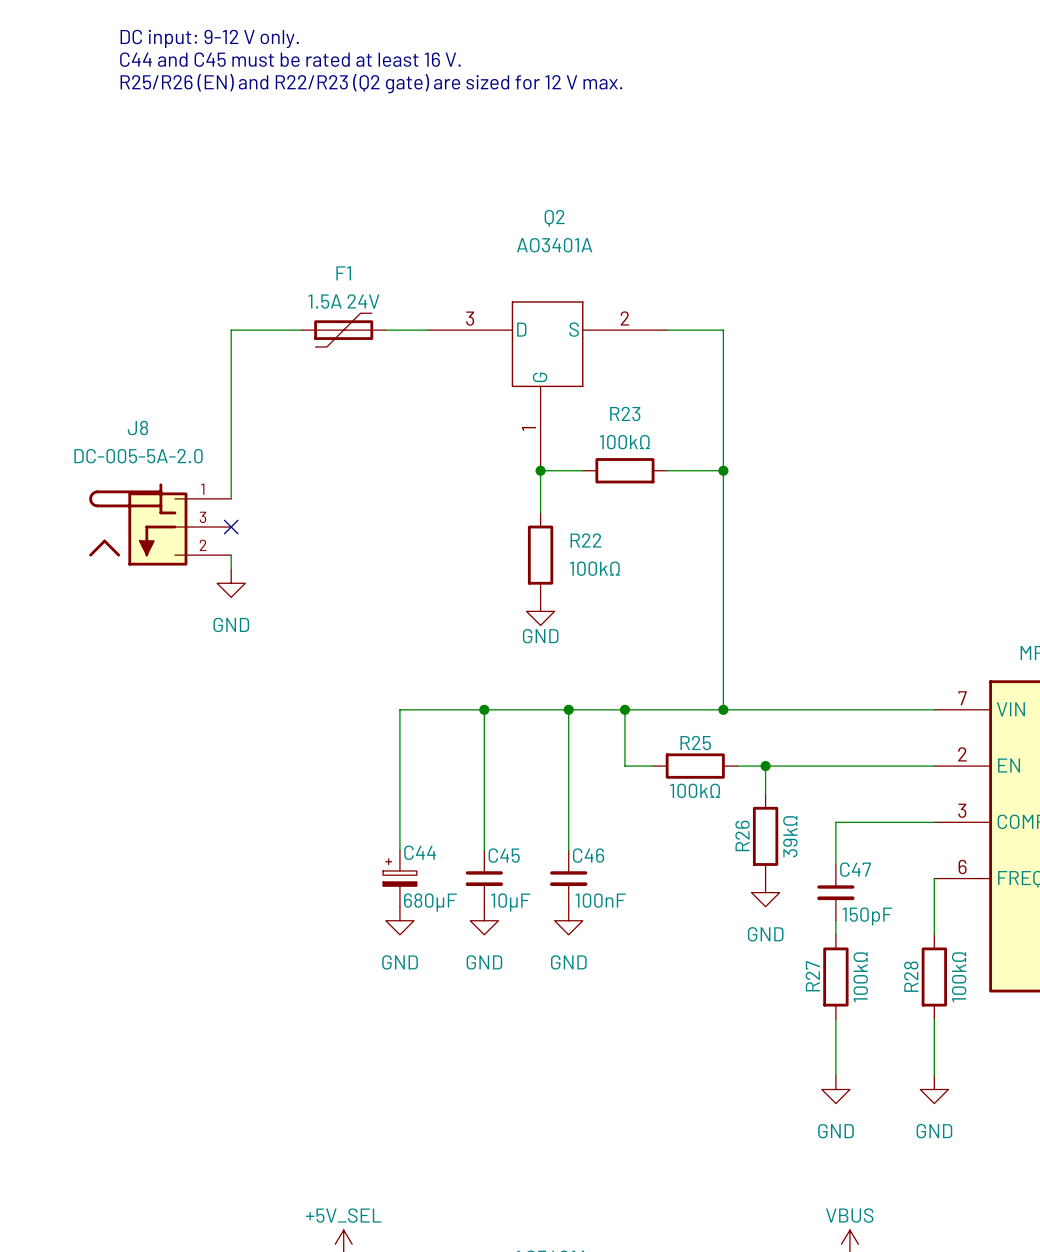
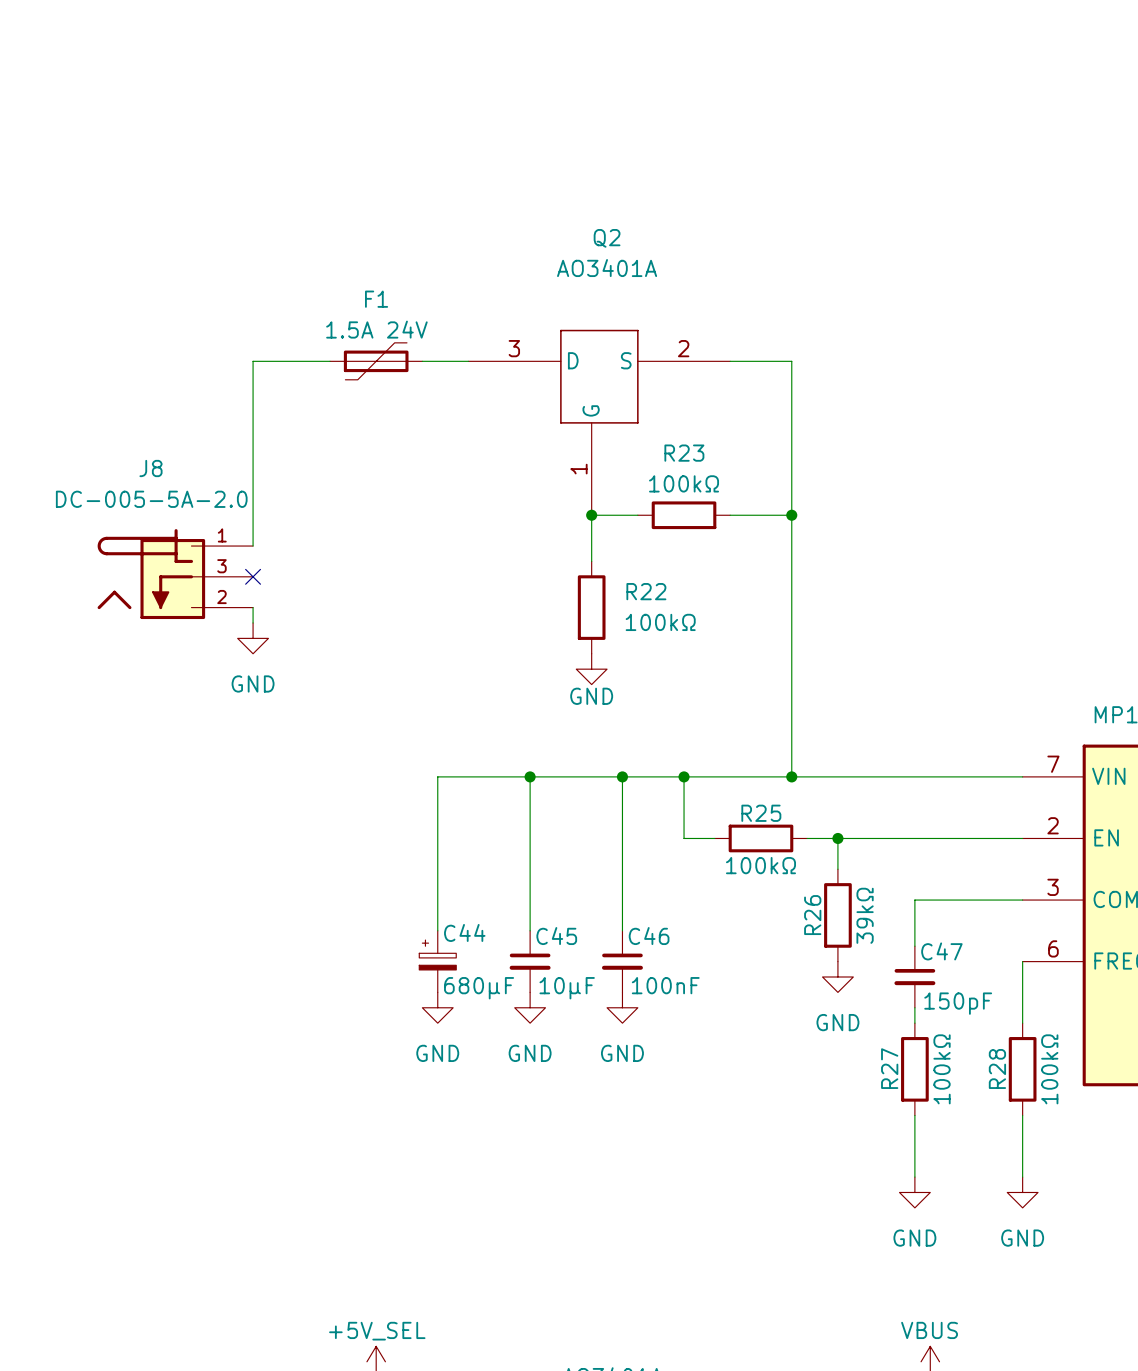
text: DC input: 9-12 V only. (209, 38) -> none
text: C44 and C45 must be rated at least 16 V. (290, 59) -> none
text: R25/R26 (EN) and R22/R23 (Q2 gate) are sized for 12 V max. (371, 83) -> none

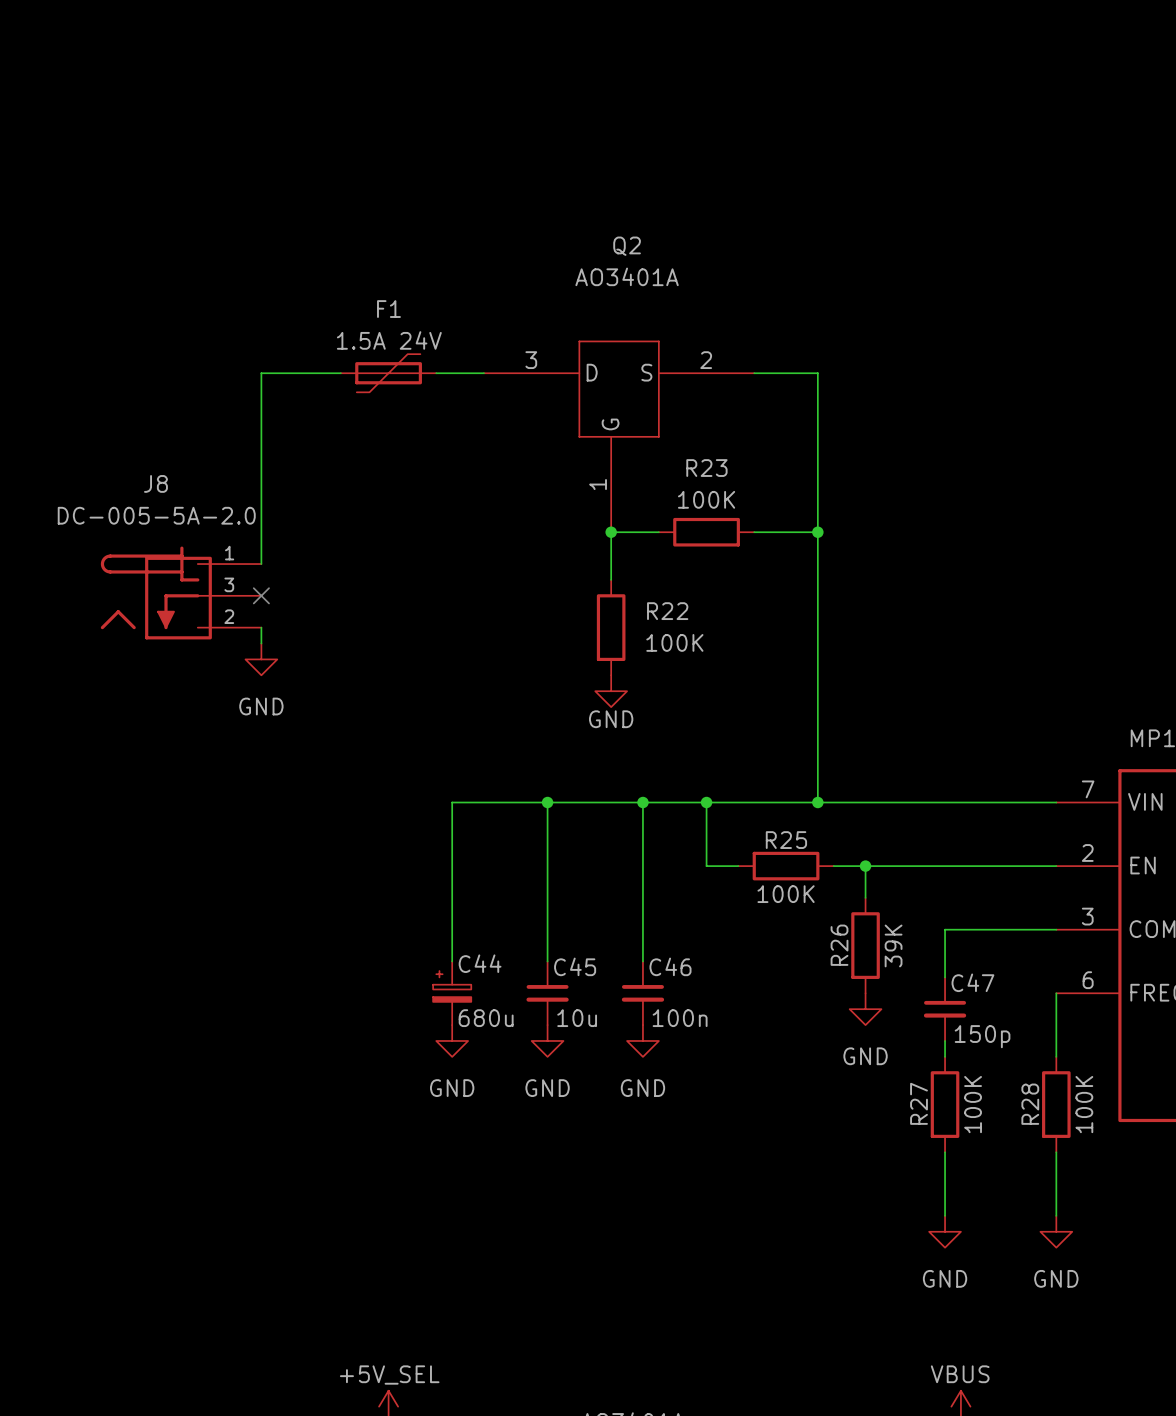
R23 value: 100kΩ (684, 483) -> 100K (706, 499)
R22 value: 100kΩ (660, 622) -> 100K (674, 642)
R25 value: 100kΩ (760, 865) -> 100K (786, 894)
R26 value: 39kΩ (865, 915) -> 39K (893, 945)
C46 value: 100nF (665, 985) -> 100n (680, 1018)
C44 value: 680µF (479, 988) -> 680u (486, 1018)
C45 value: 10µF (567, 988) -> 10u (577, 1018)
C47 value: 150pF (958, 1003) -> 150p (982, 1036)
R27 value: 100kΩ (942, 1069) -> 100K (973, 1104)
R28 value: 100kΩ (1049, 1069) -> 100K (1084, 1104)

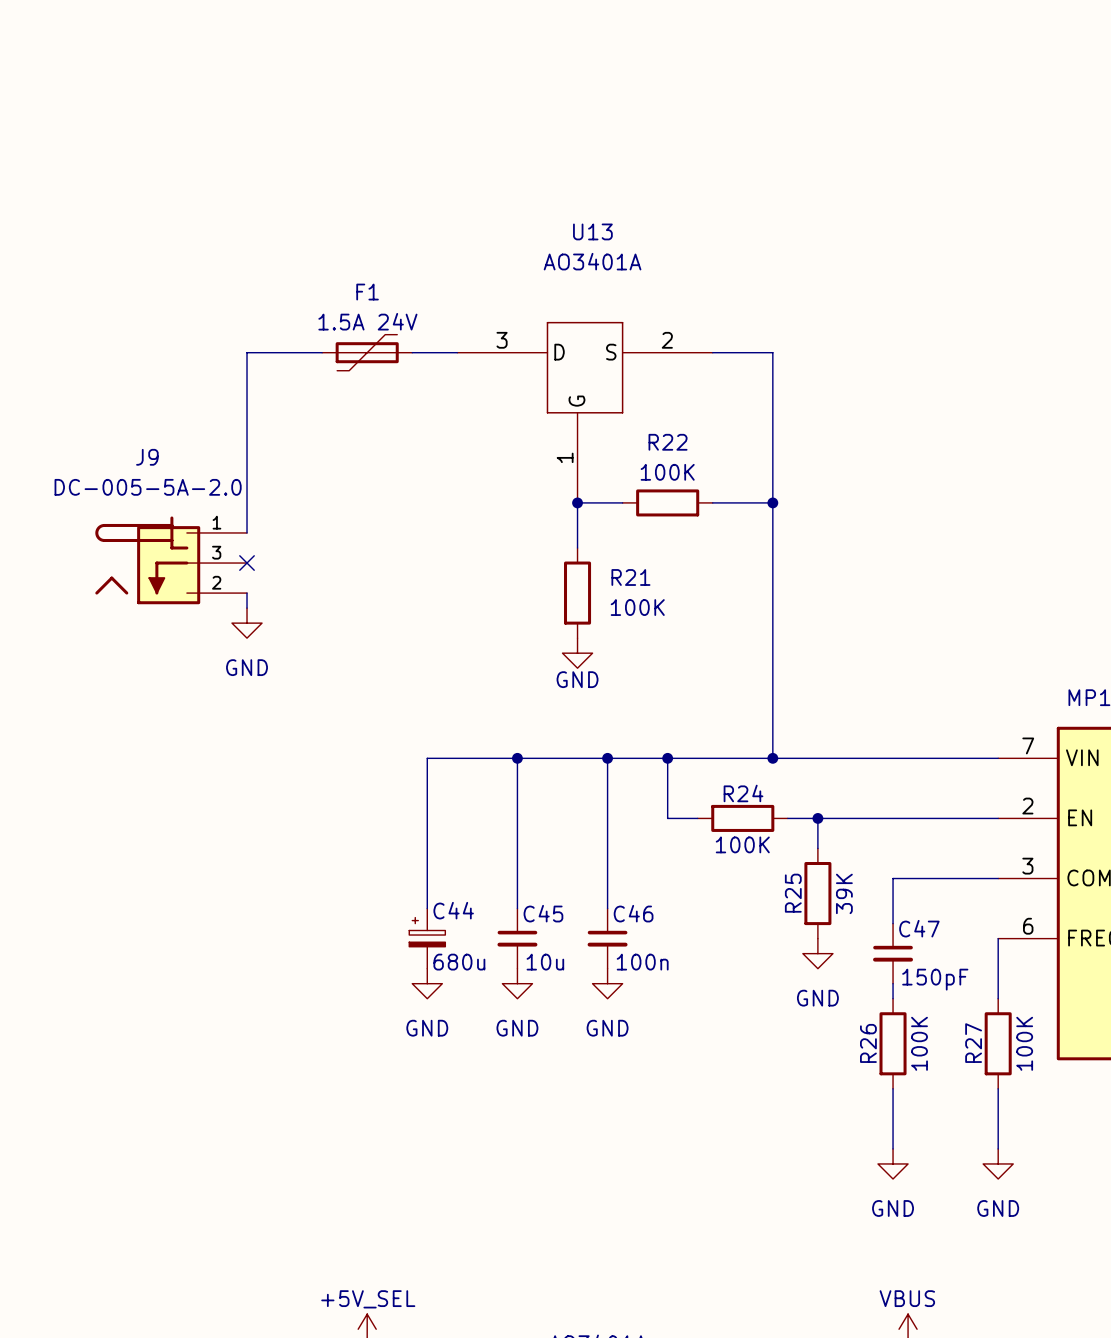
Q2 name: Q2 (627, 246) -> U13 (592, 231)
R23 name: R23 (706, 468) -> R22 (668, 442)
J8 name: J8 (155, 483) -> J9 (147, 457)
R22 name: R22 (667, 611) -> R21 (630, 577)
R25 name: R25 (786, 840) -> R24 (743, 793)
R26 name: R26 (839, 945) -> R25 (793, 893)
C47 value: 150p (982, 1036) -> 150pF (935, 979)
R27 name: R27 (919, 1103) -> R26 (868, 1043)
R28 name: R28 (1030, 1104) -> R27 (973, 1043)

